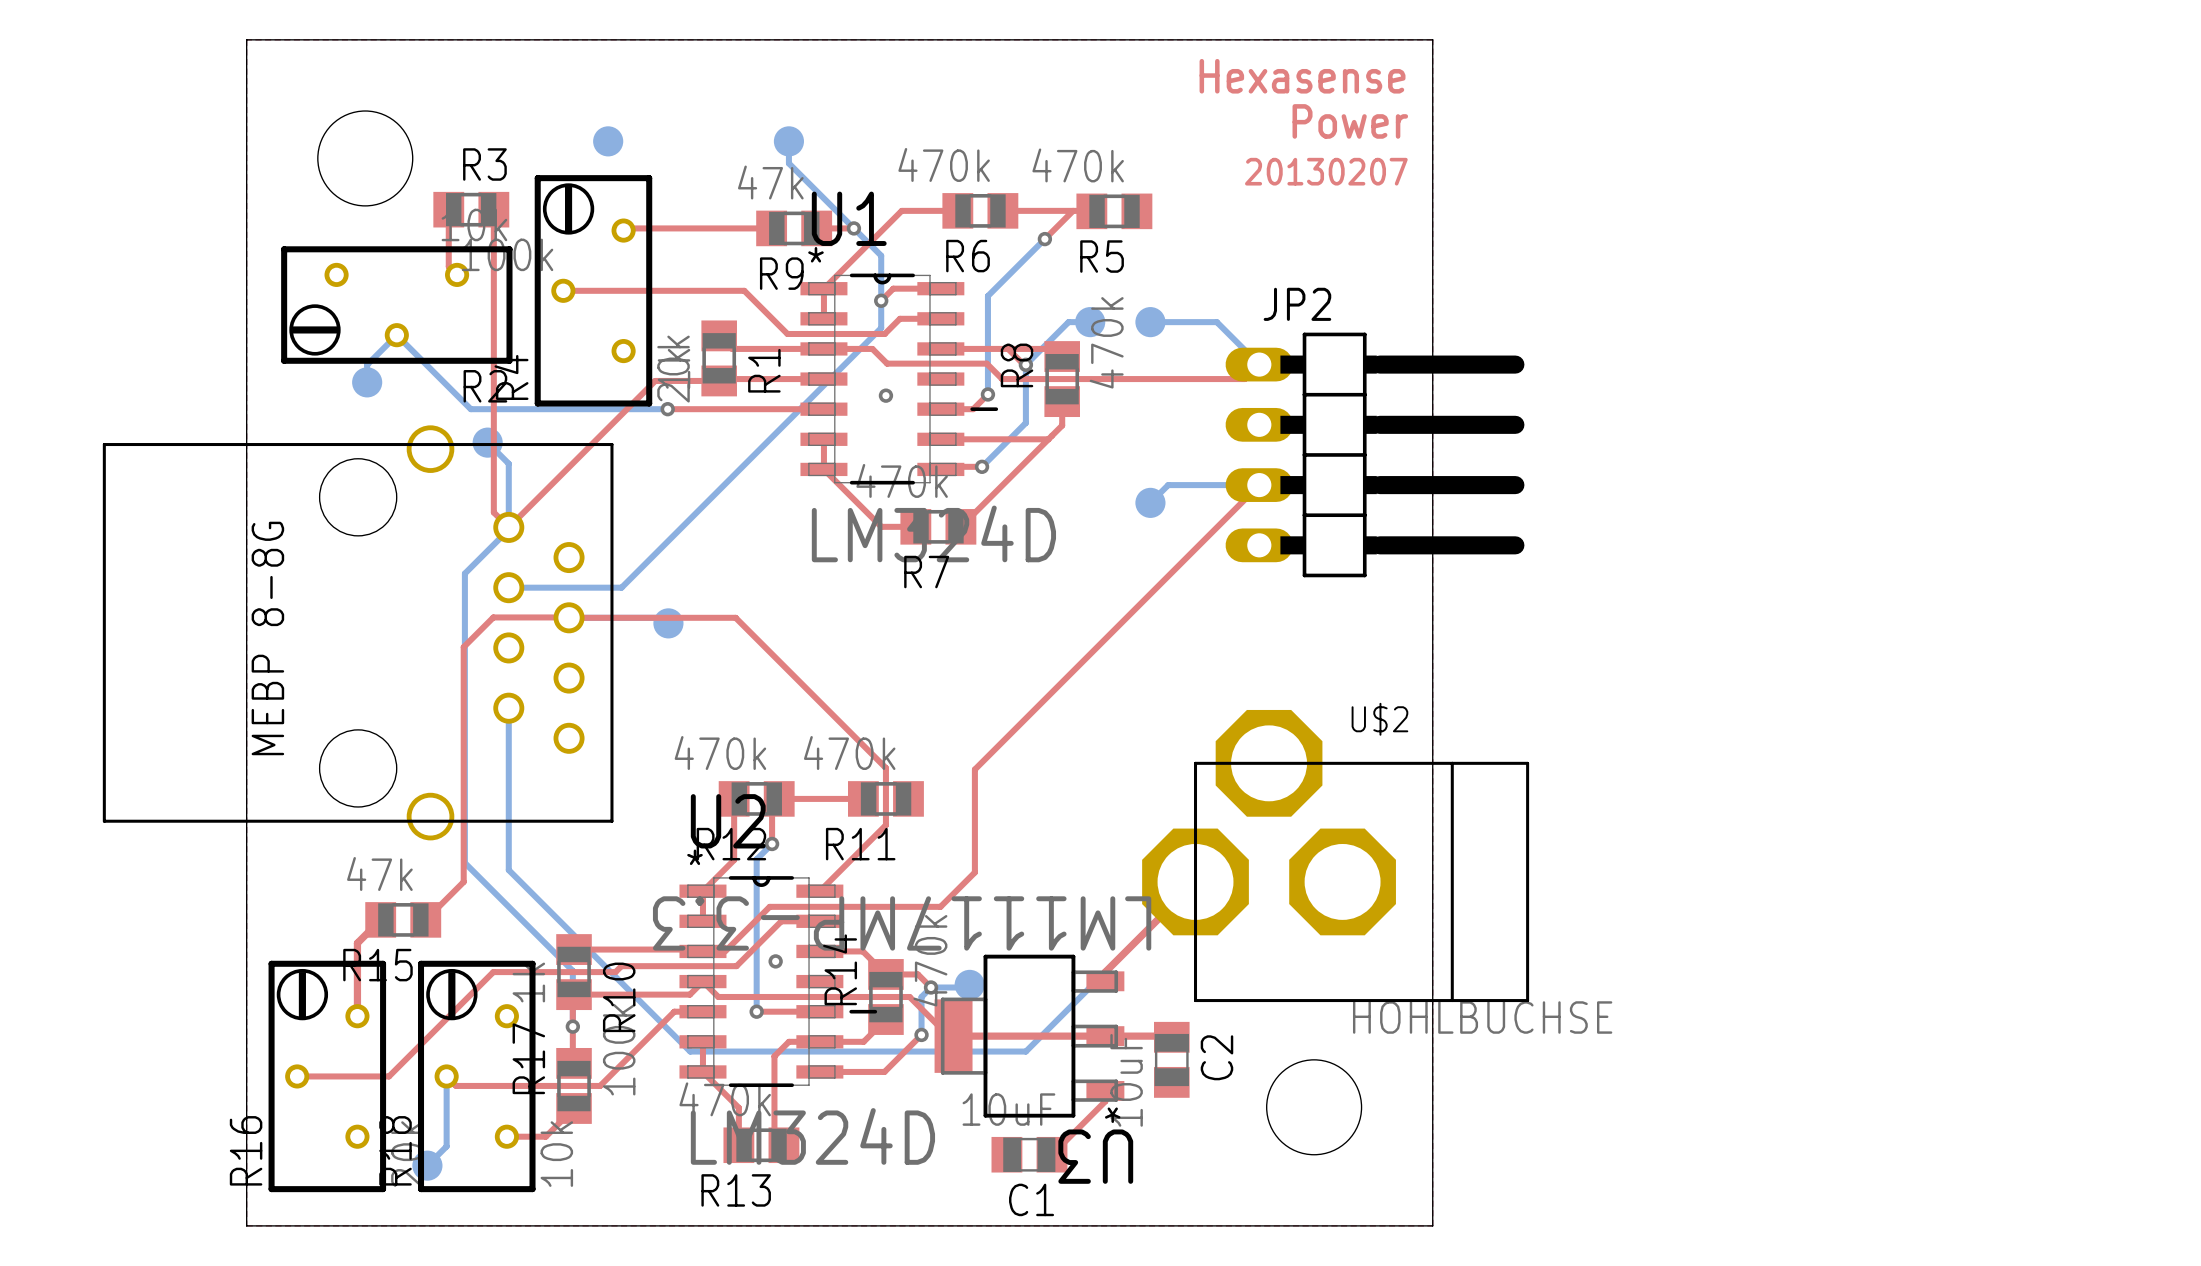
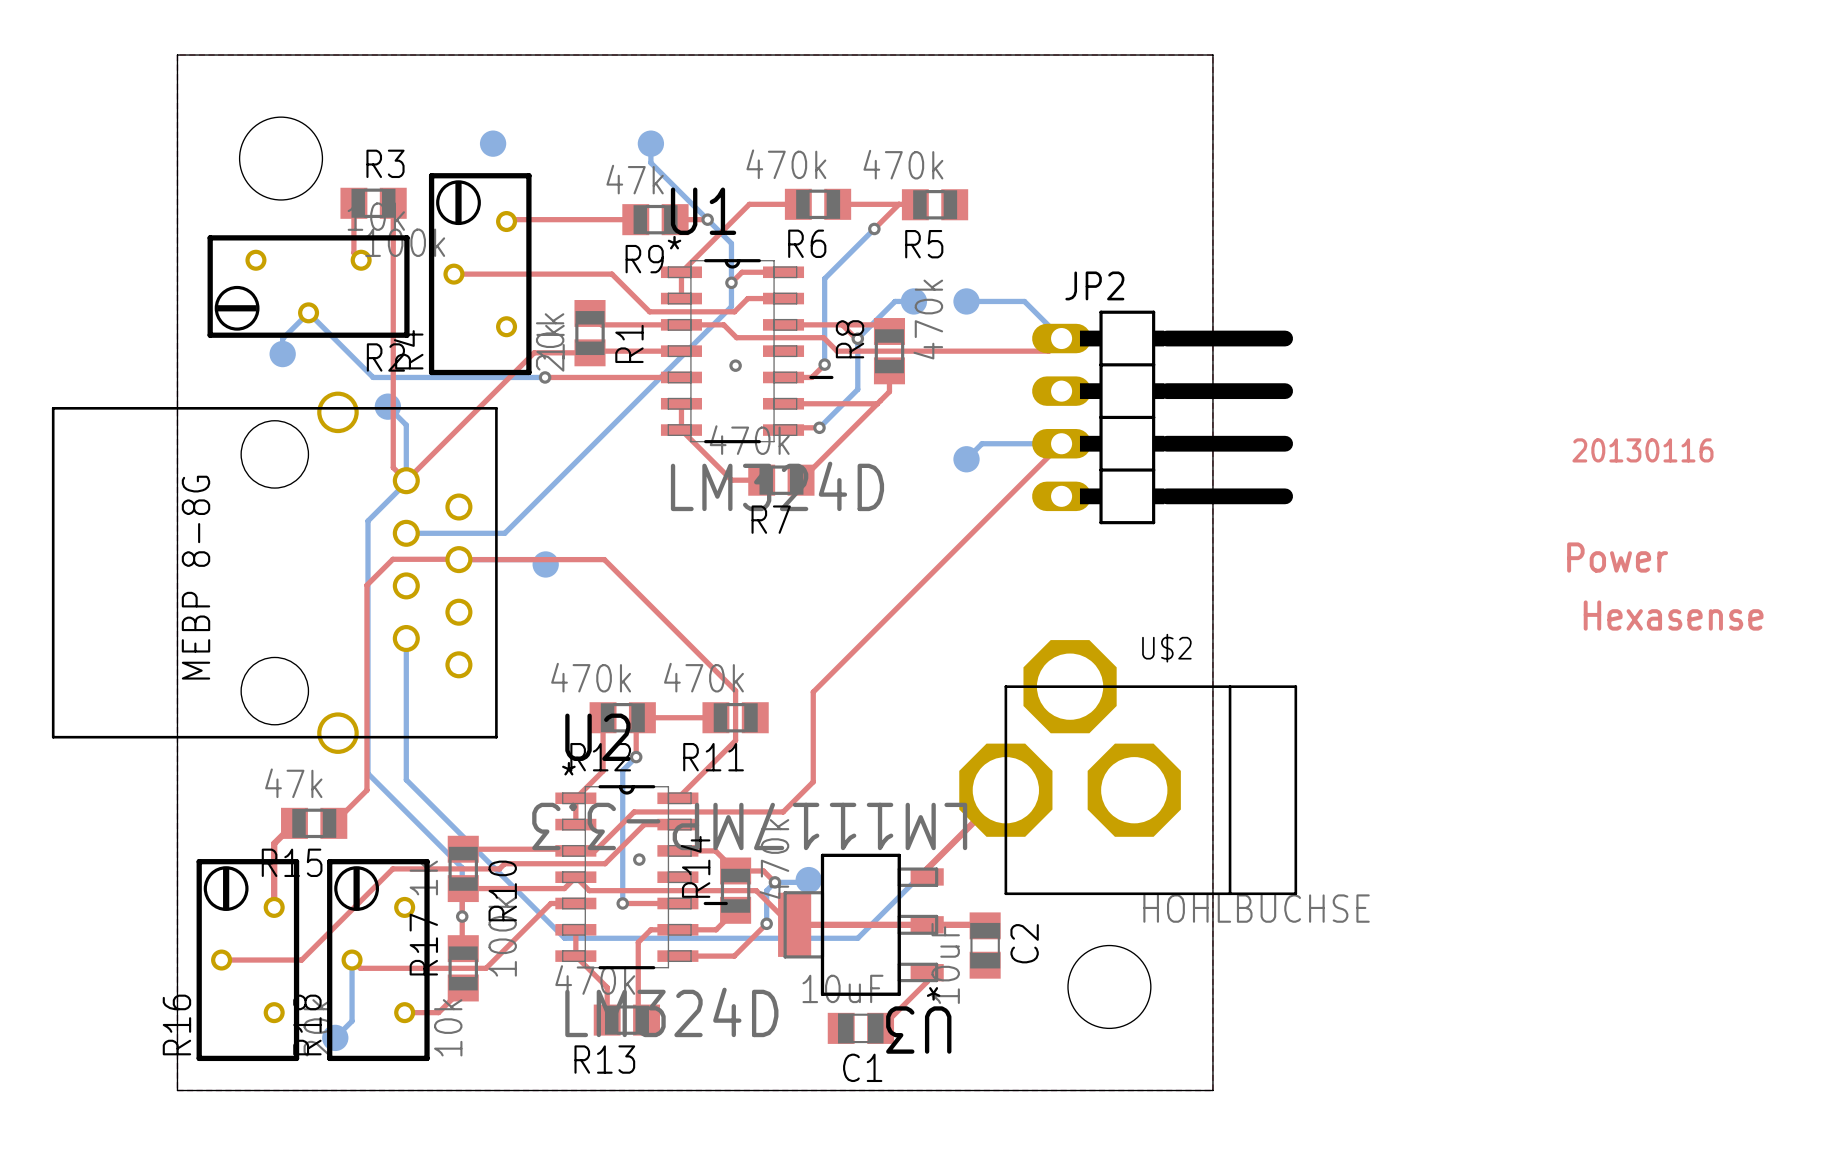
text: Hexasense (1302, 76) -> none
text: Power (1350, 121) -> none
text: 20130207 (1326, 171) -> none
text: none -> 20130116 (1642, 450)
text: none -> Power (1617, 557)
text: none -> Hexasense (1673, 615)

